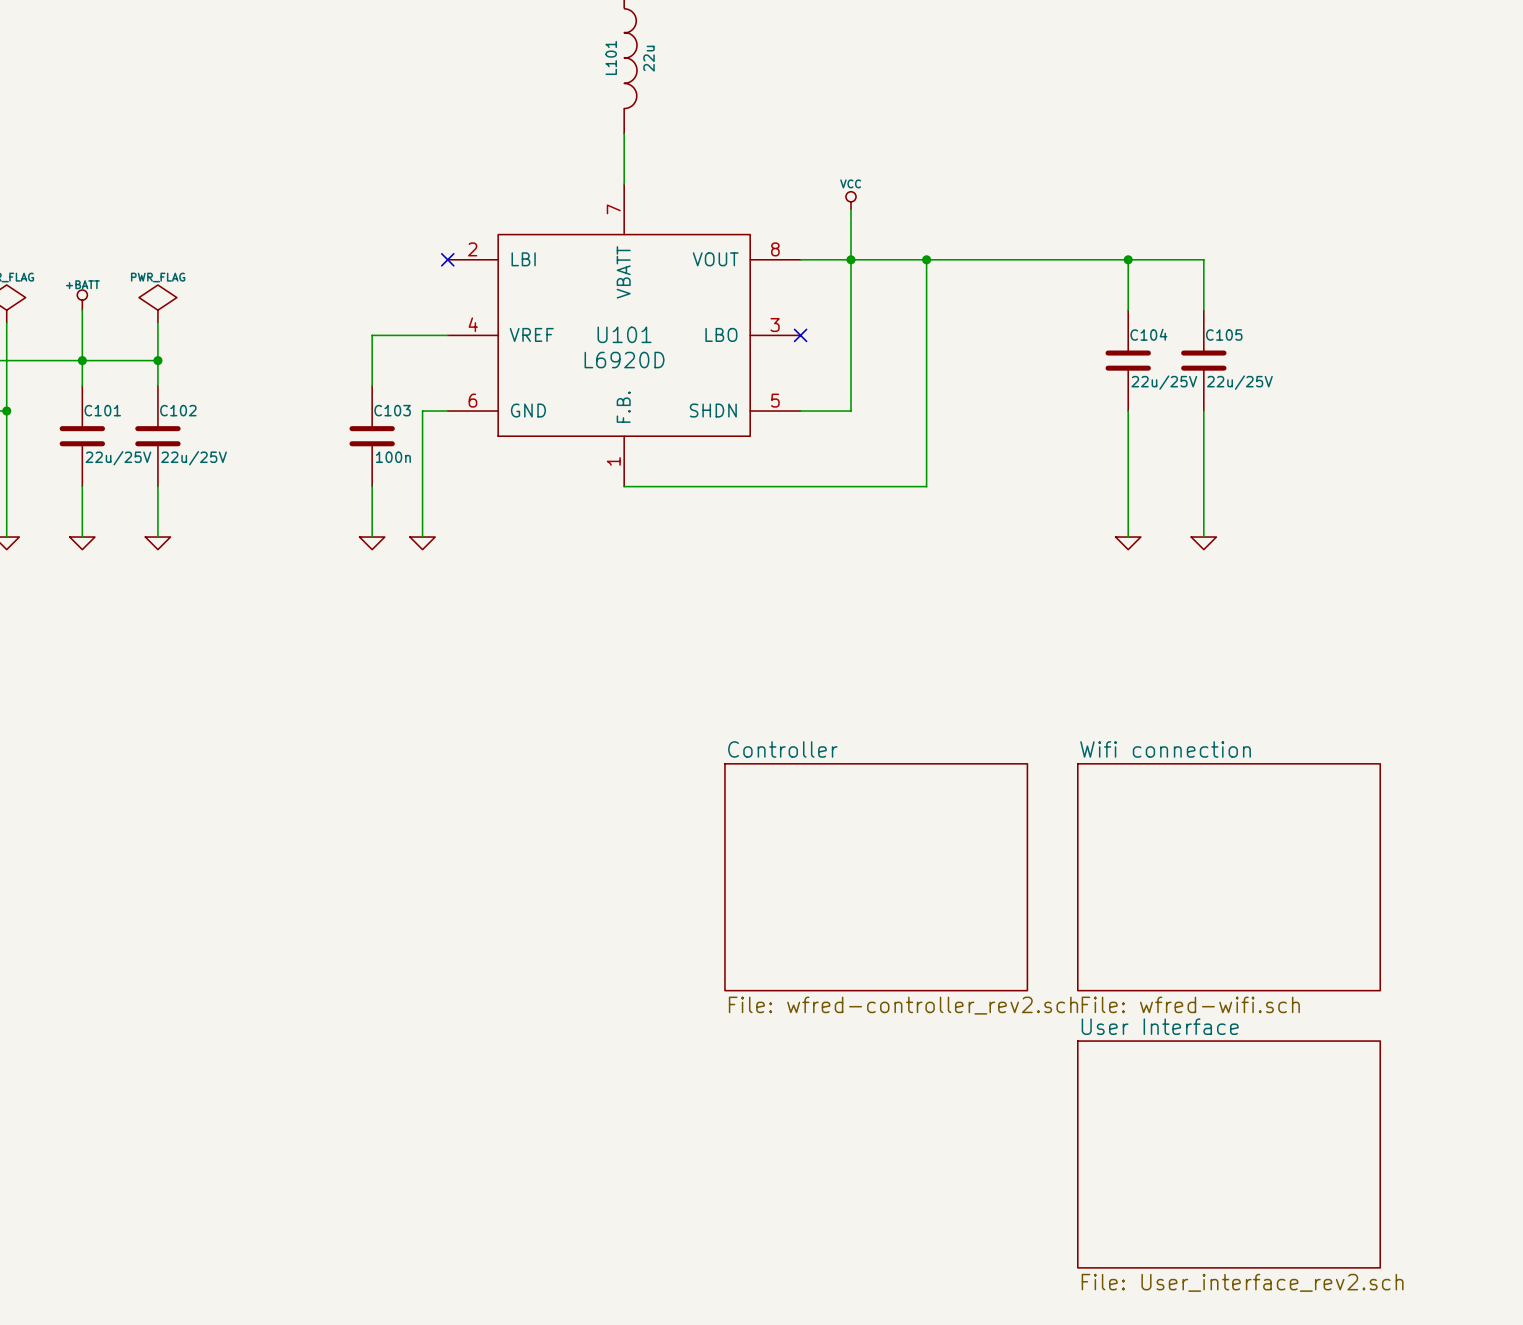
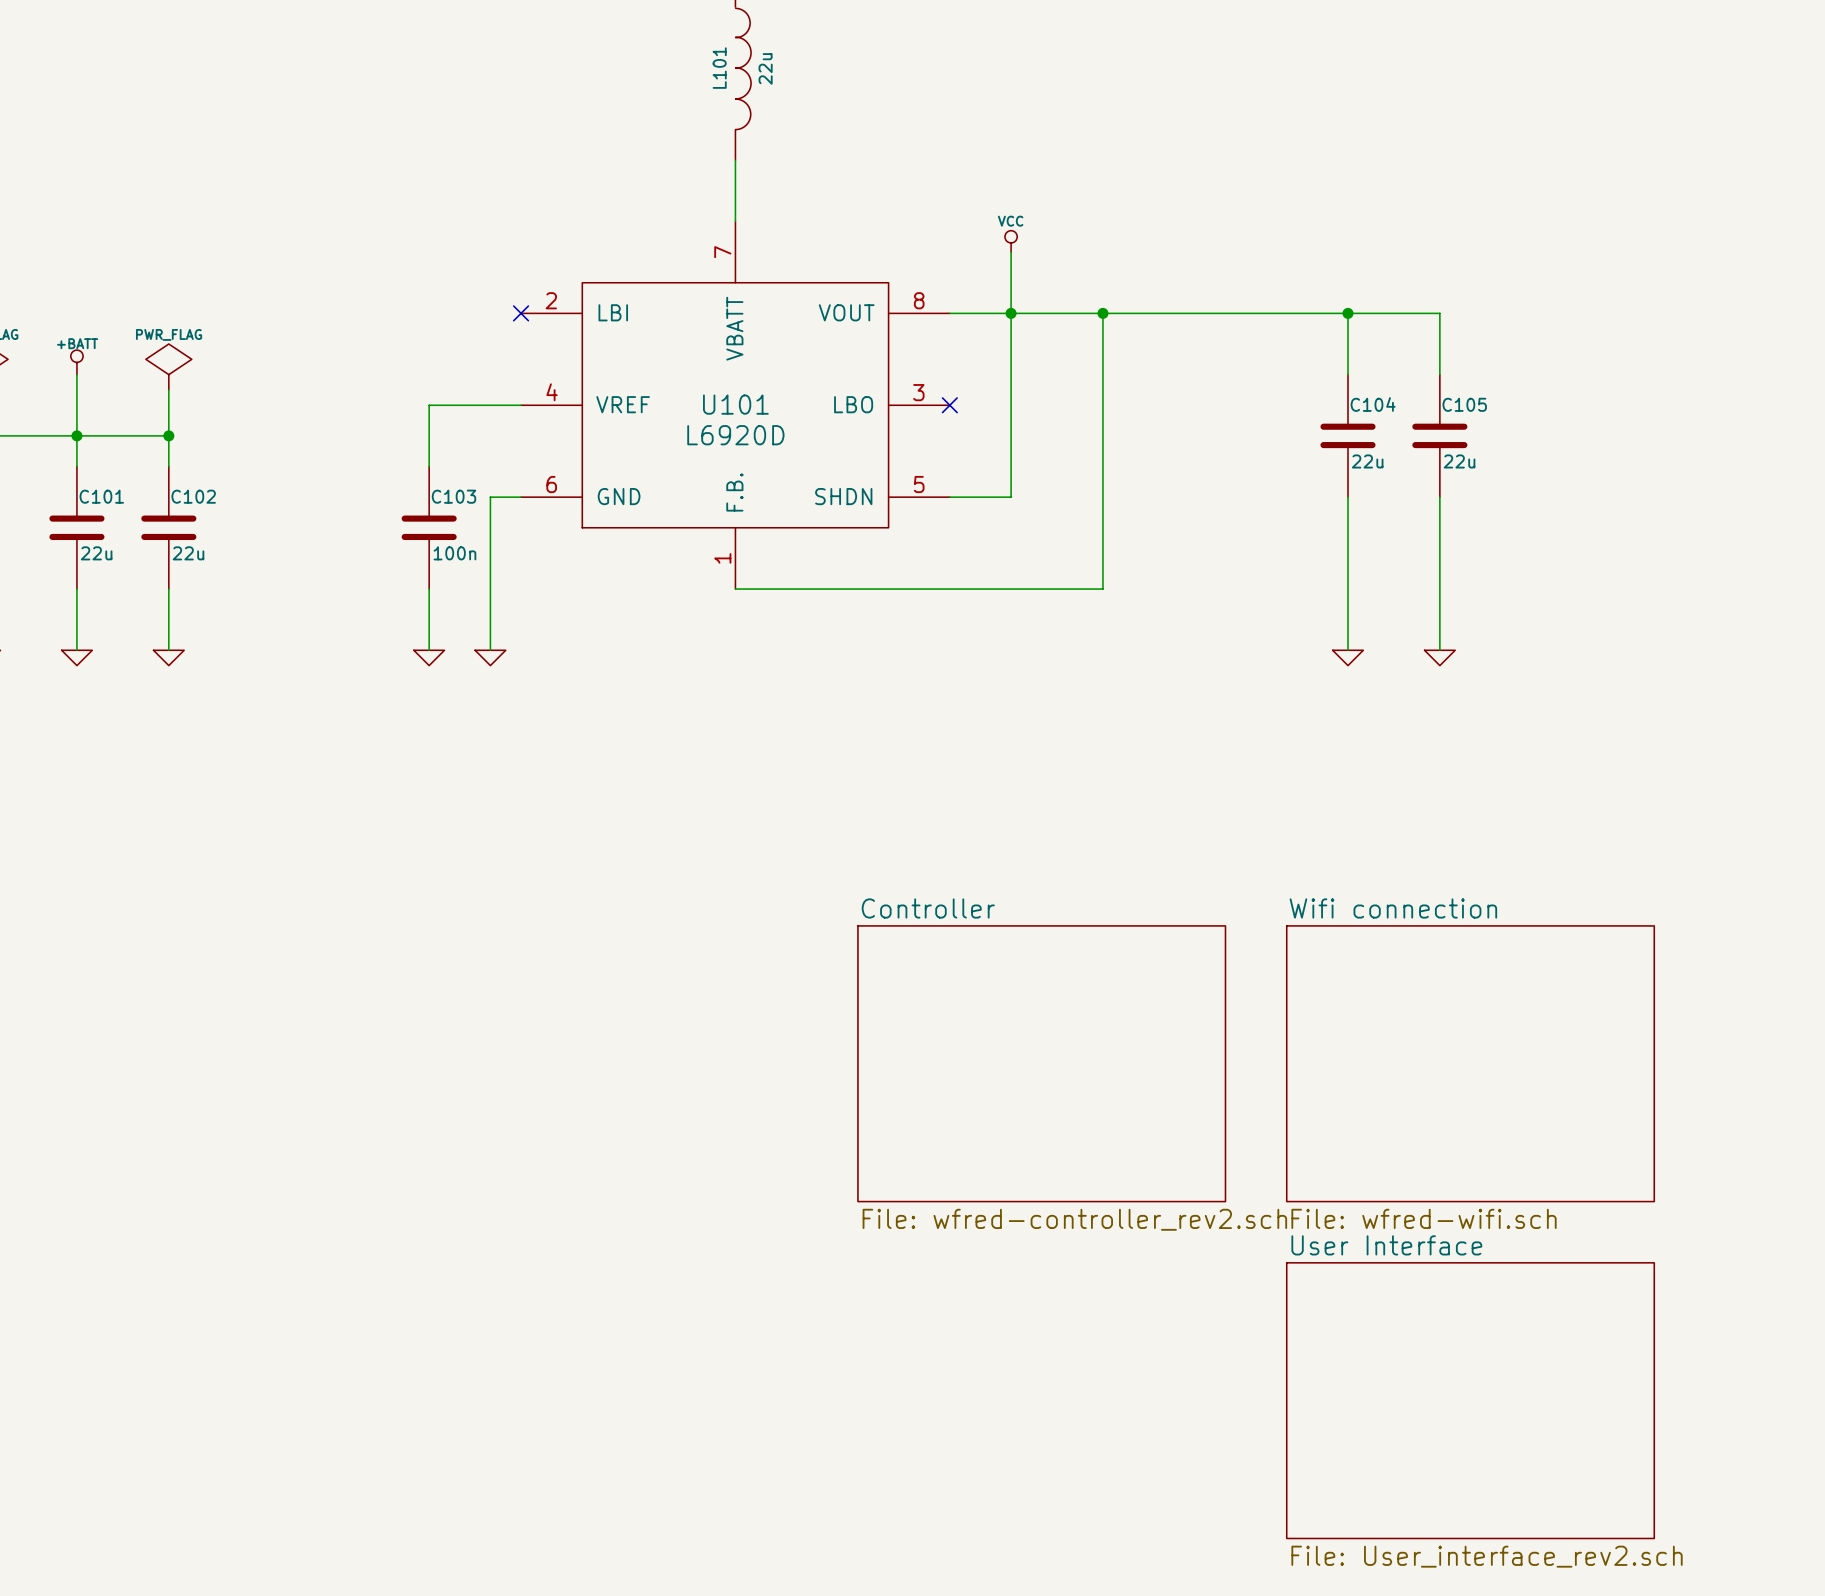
C104 value: 22u/25V (1164, 382) -> 22u (1367, 461)
C105 value: 22u/25V (1239, 382) -> 22u (1459, 461)
C101 value: 22u/25V (118, 458) -> 22u (96, 553)
C102 value: 22u/25V (194, 458) -> 22u (188, 553)

